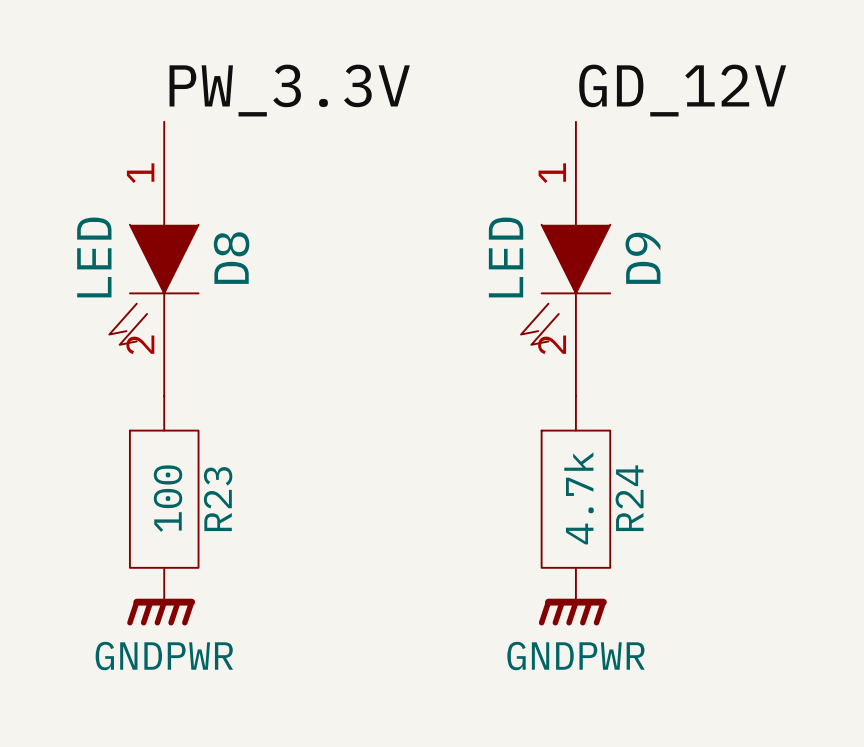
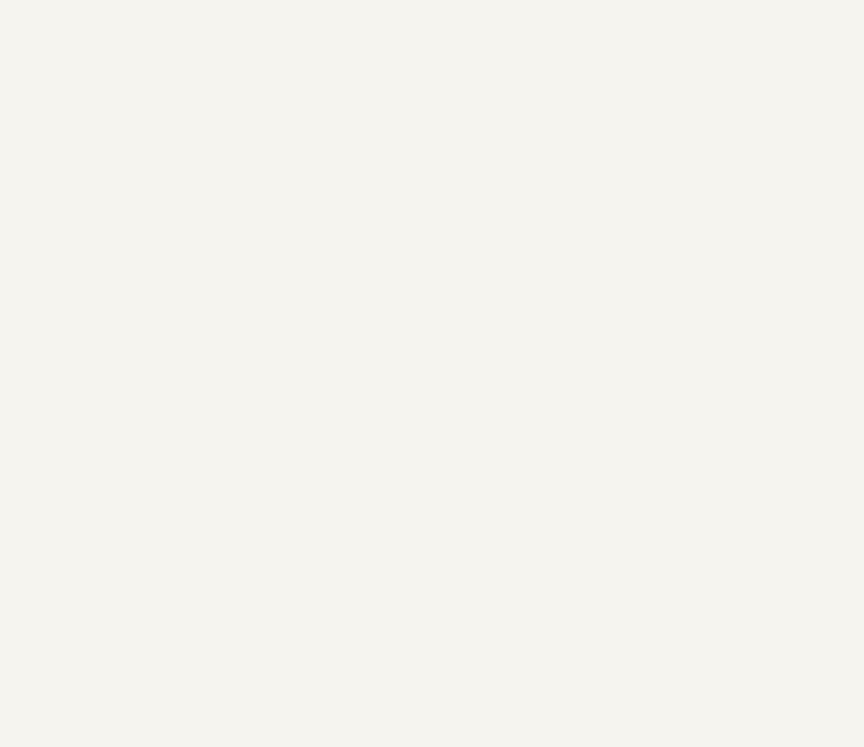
label: PW_3.3V (289, 90) -> none
label: GD_12V (682, 90) -> none
D8: LED (153, 259) -> none
D9: LED (565, 259) -> none
R23: 100 (164, 499) -> none
R24: 4.7k (575, 499) -> none
power symbol: GNDPWR (161, 612) -> none
power symbol: GNDPWR (572, 612) -> none

